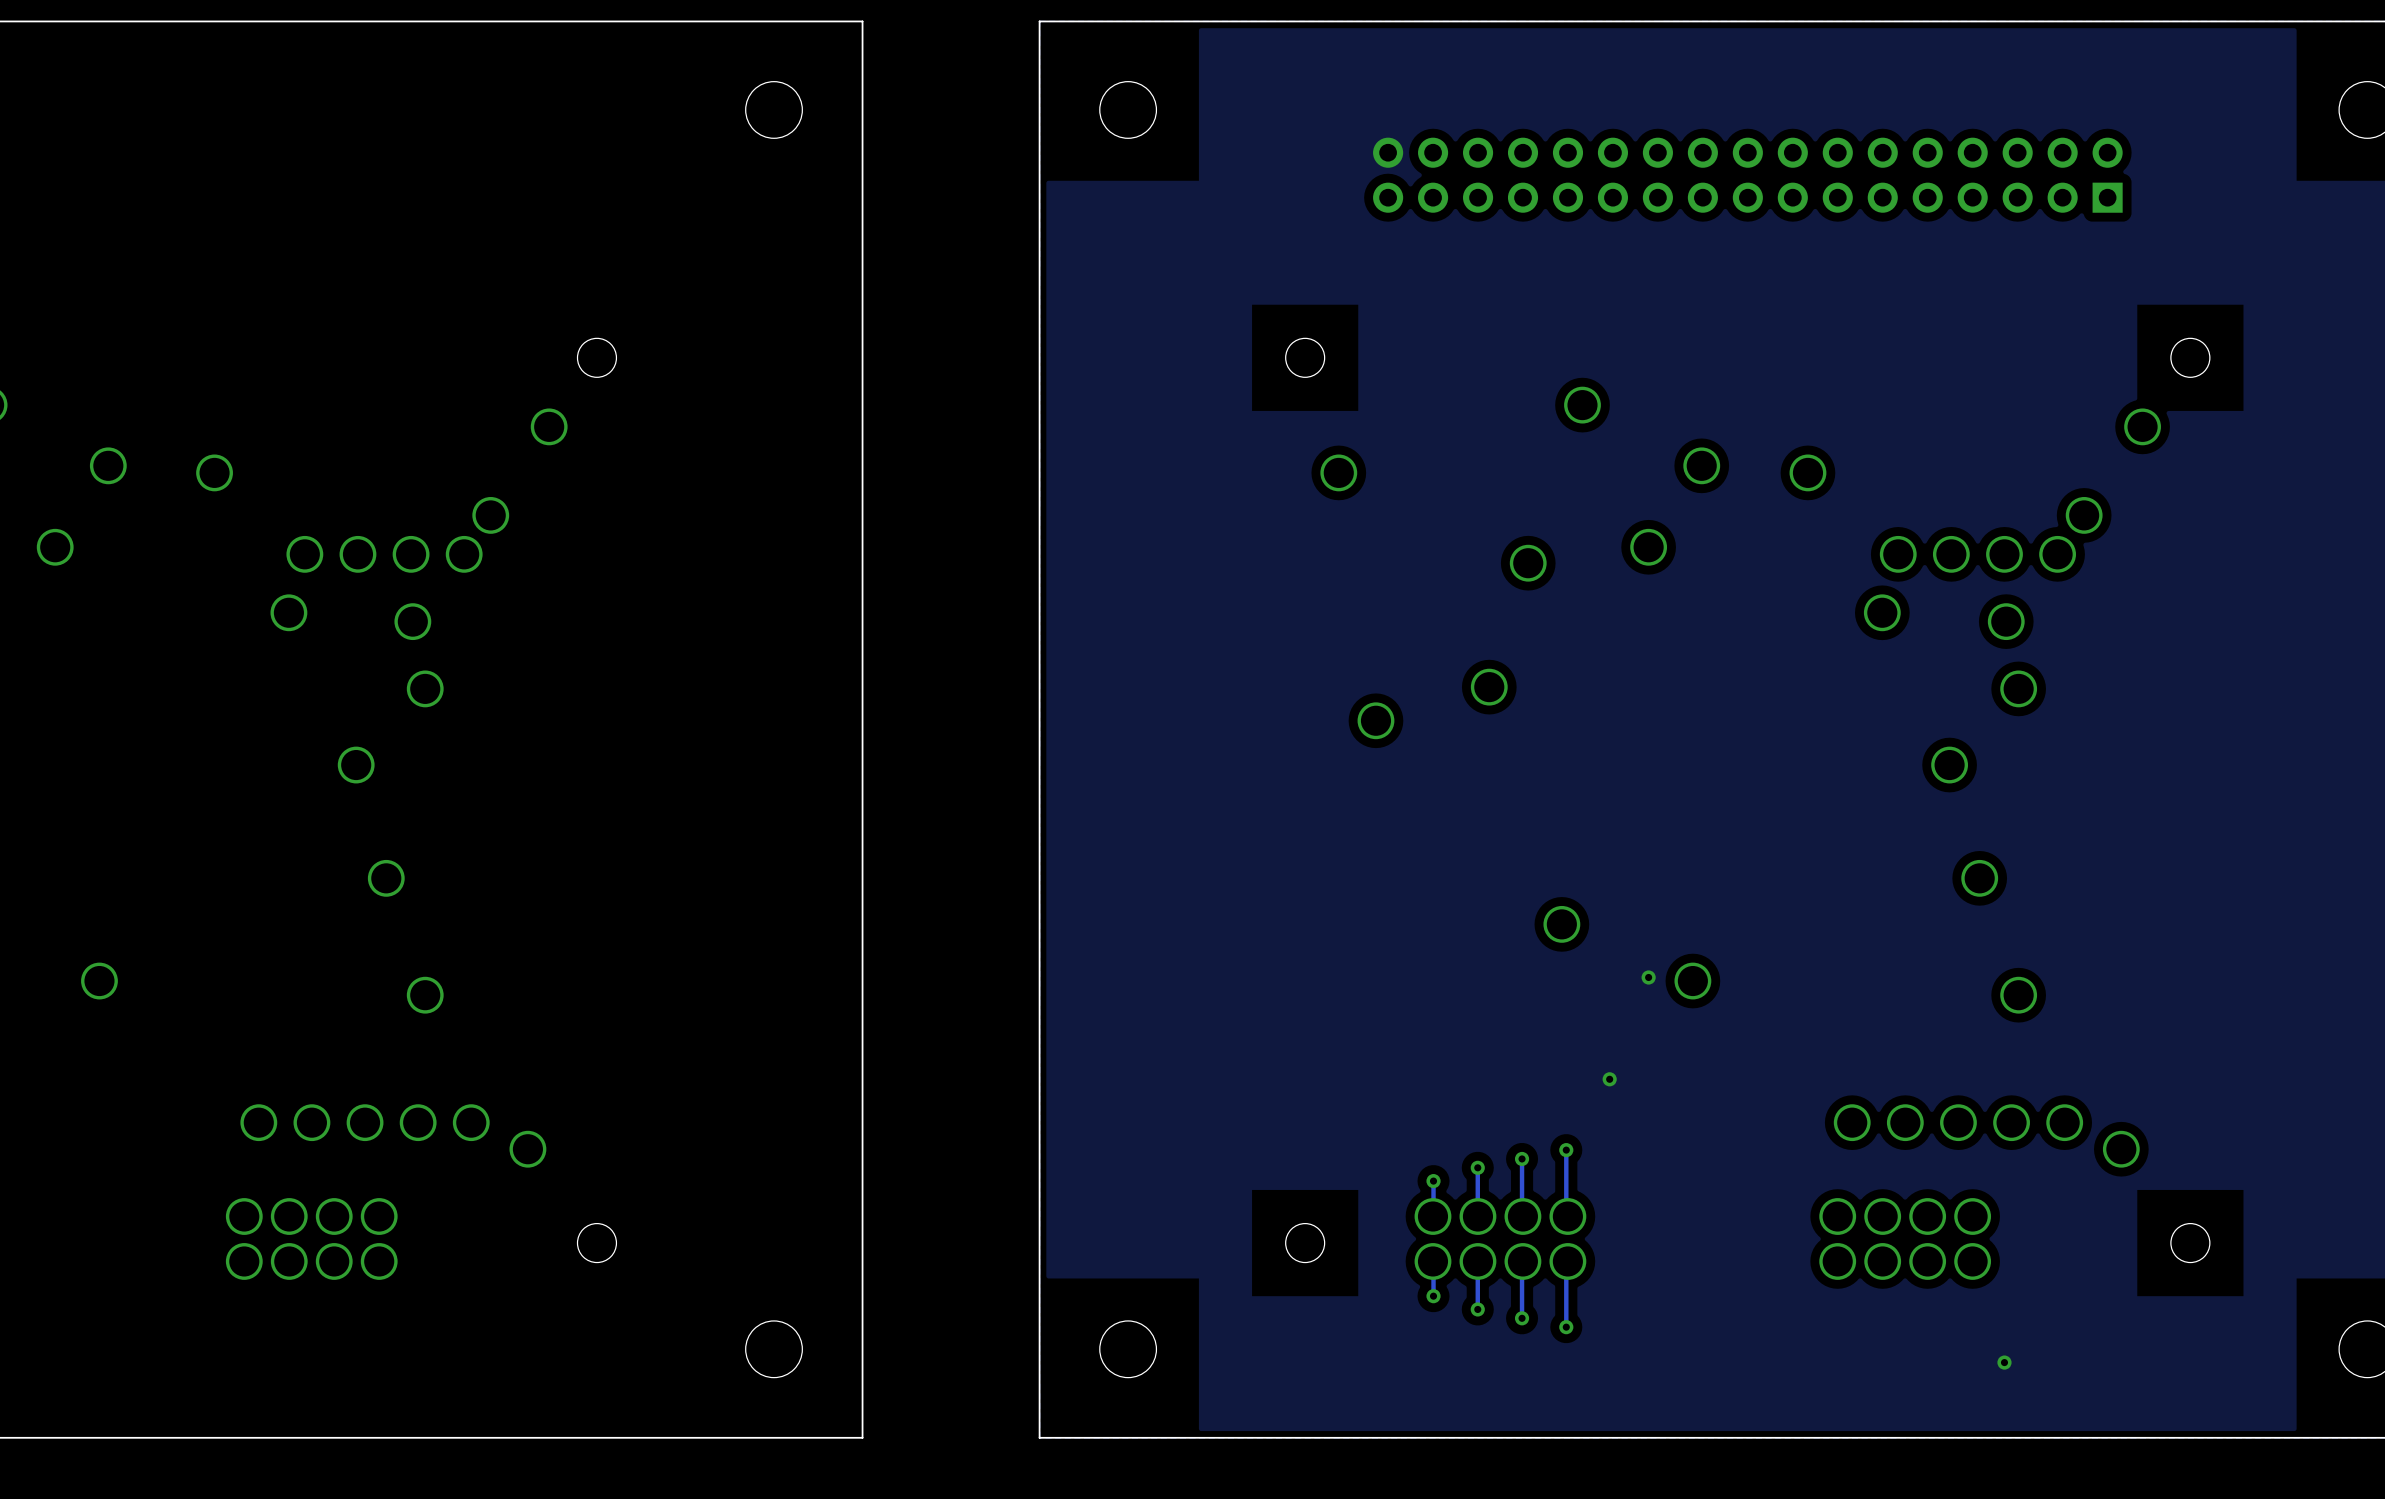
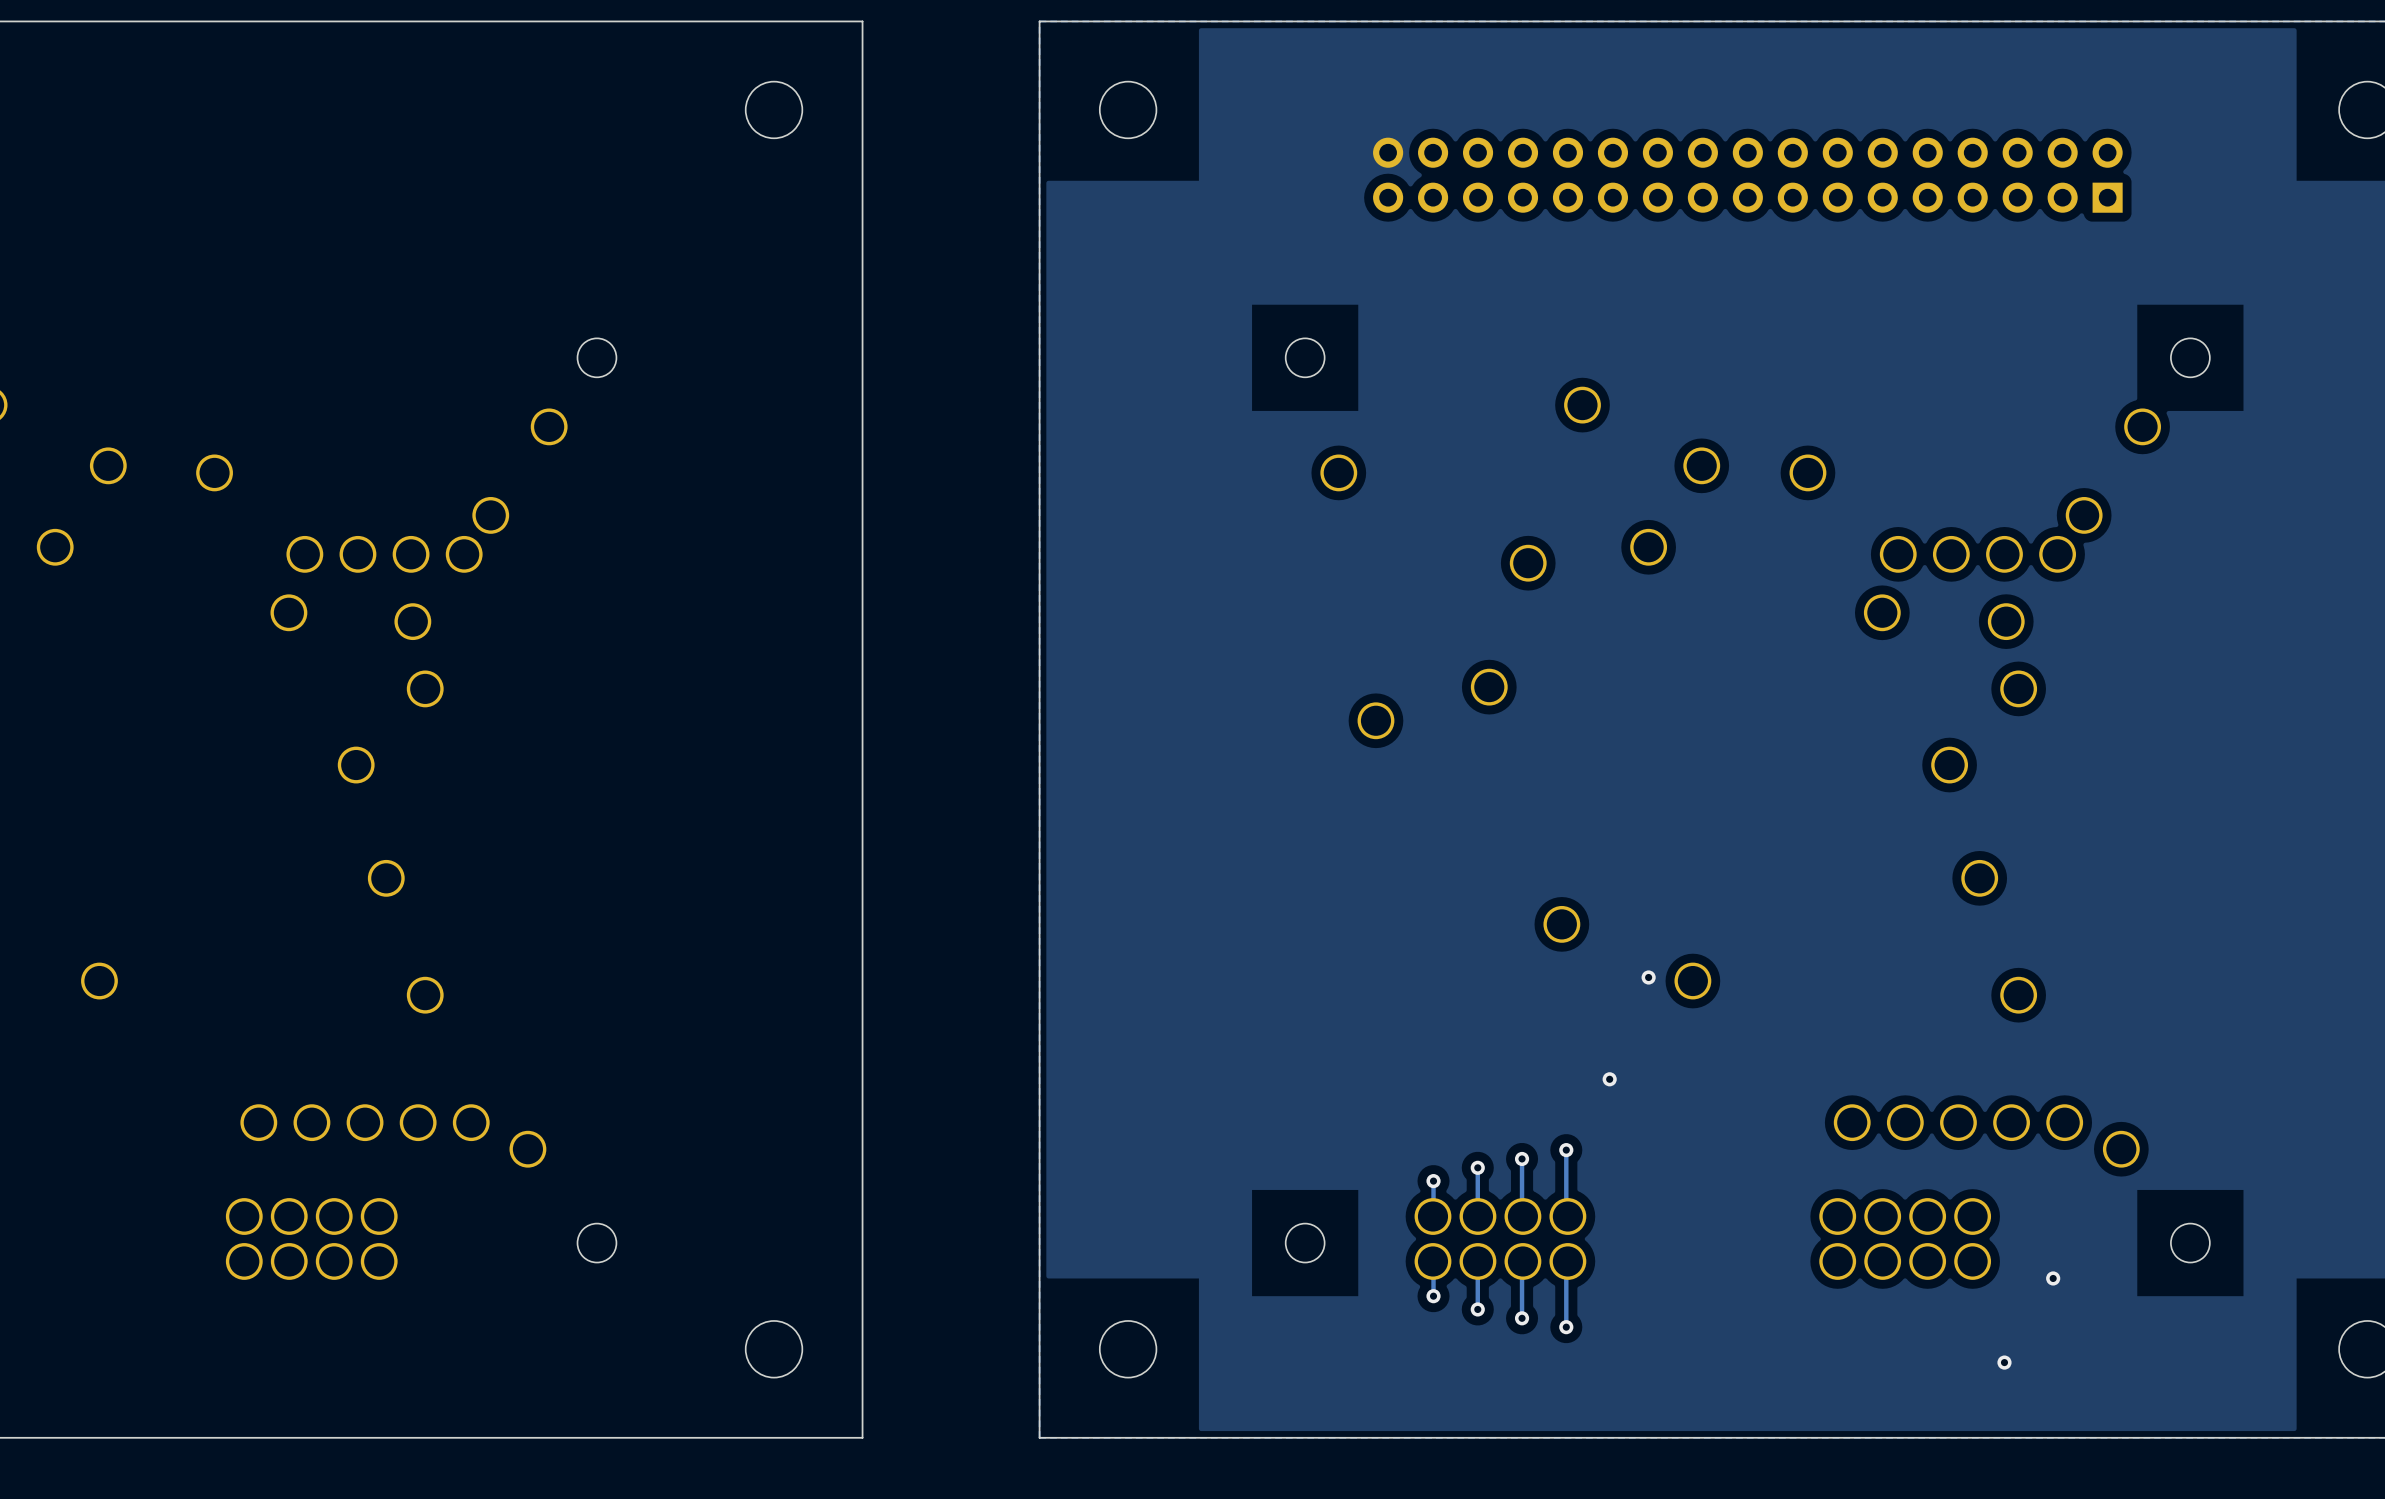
via: none -> (2053, 1278)

